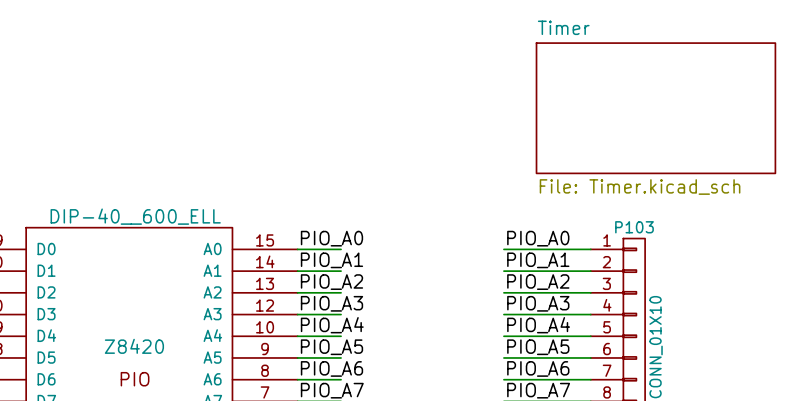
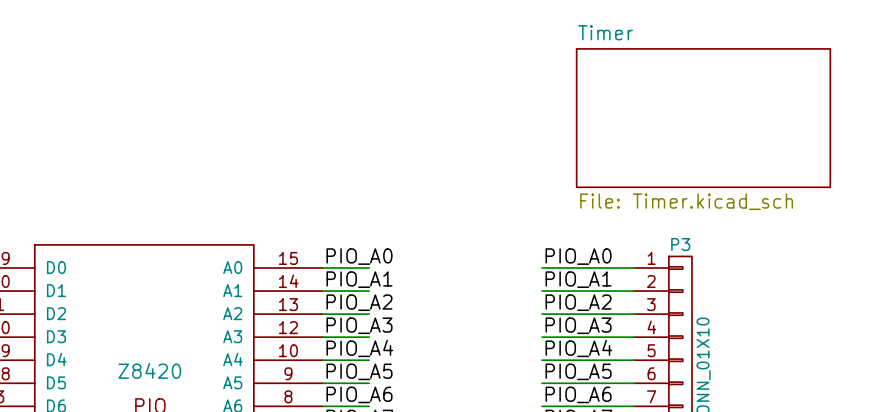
part text: DIP-40__600_ELL (135, 216) -> none
P103 name: P103 (634, 227) -> P3 (680, 244)

